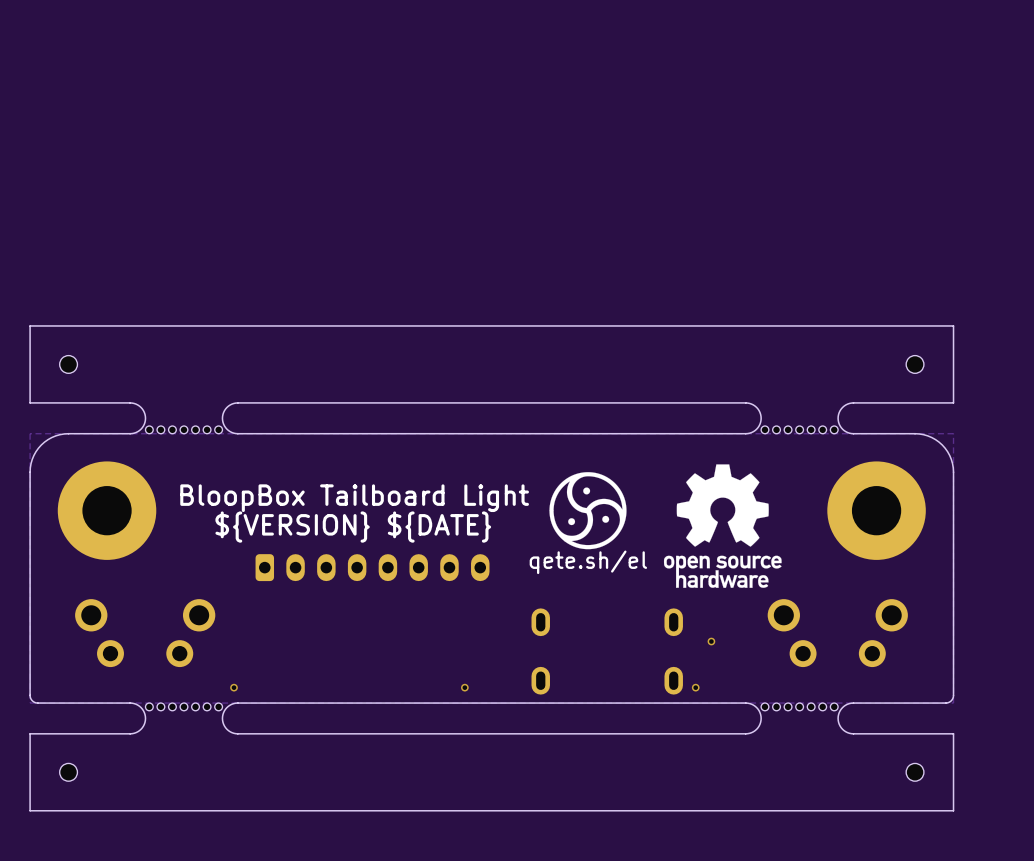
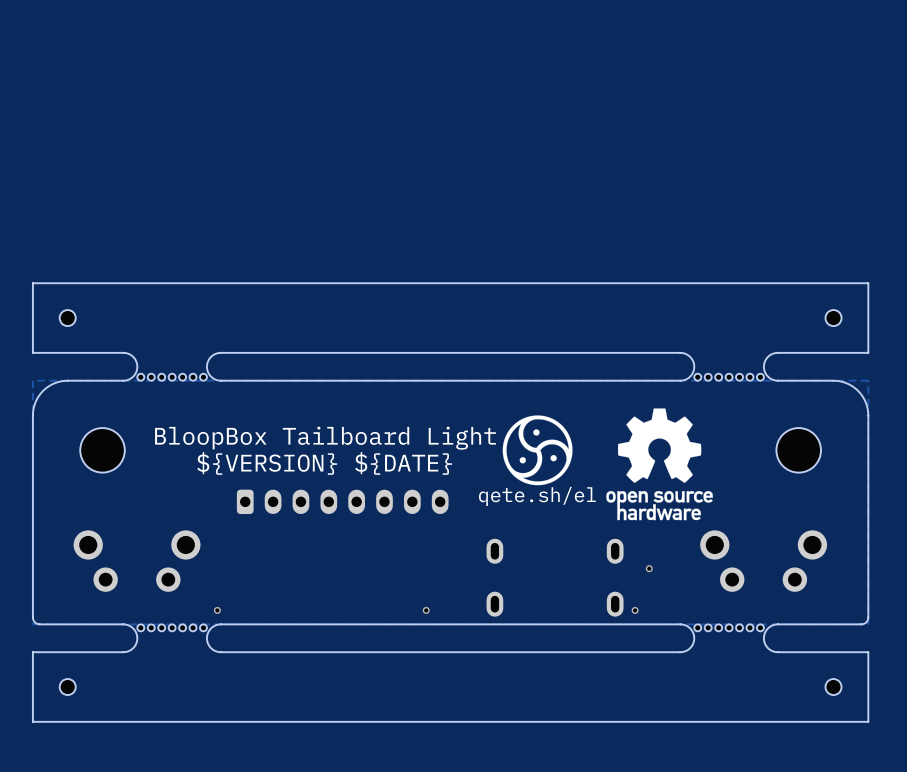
part footprint: [57, 461, 157, 560] -> [80, 428, 125, 473]
part footprint: [827, 461, 926, 560] -> [776, 428, 821, 473]

